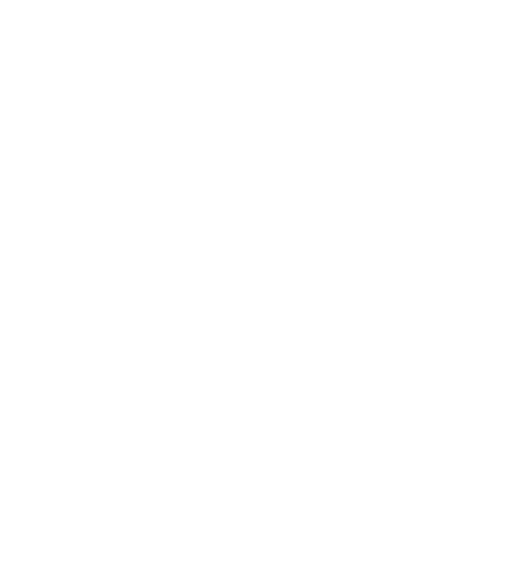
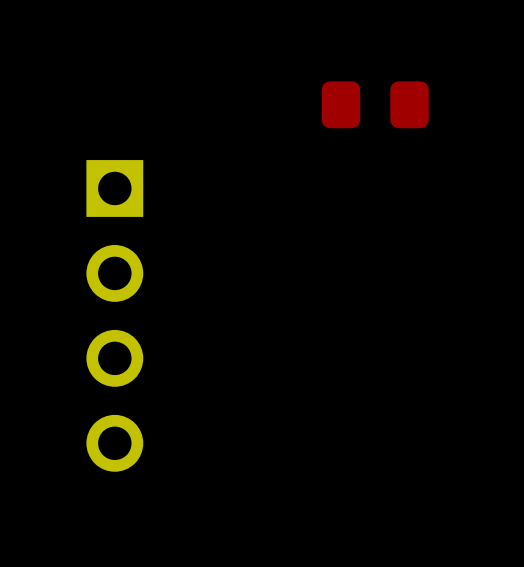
part: none -> (375, 104)
part: none -> (114, 315)

